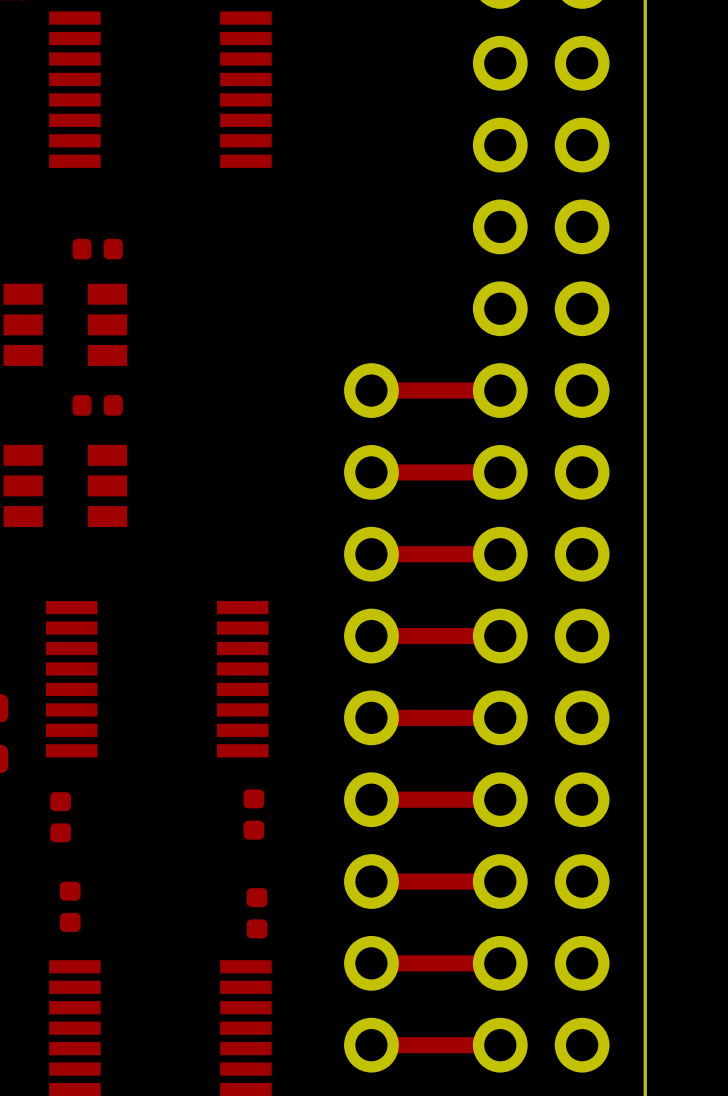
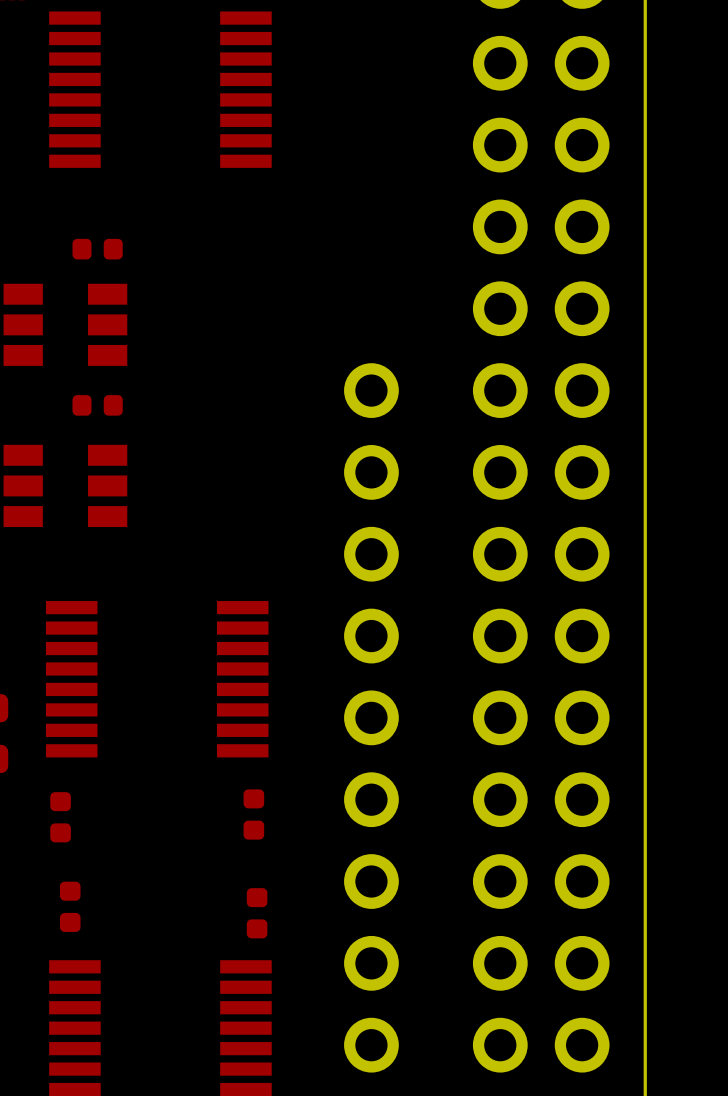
top track: (500, 390) (371, 390) -> none
top track: (500, 472) (371, 472) -> none
top track: (500, 554) (371, 554) -> none
top track: (500, 636) (371, 636) -> none
top track: (500, 717) (371, 717) -> none
top track: (500, 799) (371, 799) -> none
top track: (500, 881) (371, 881) -> none
top track: (500, 963) (371, 963) -> none
top track: (500, 1045) (371, 1045) -> none

